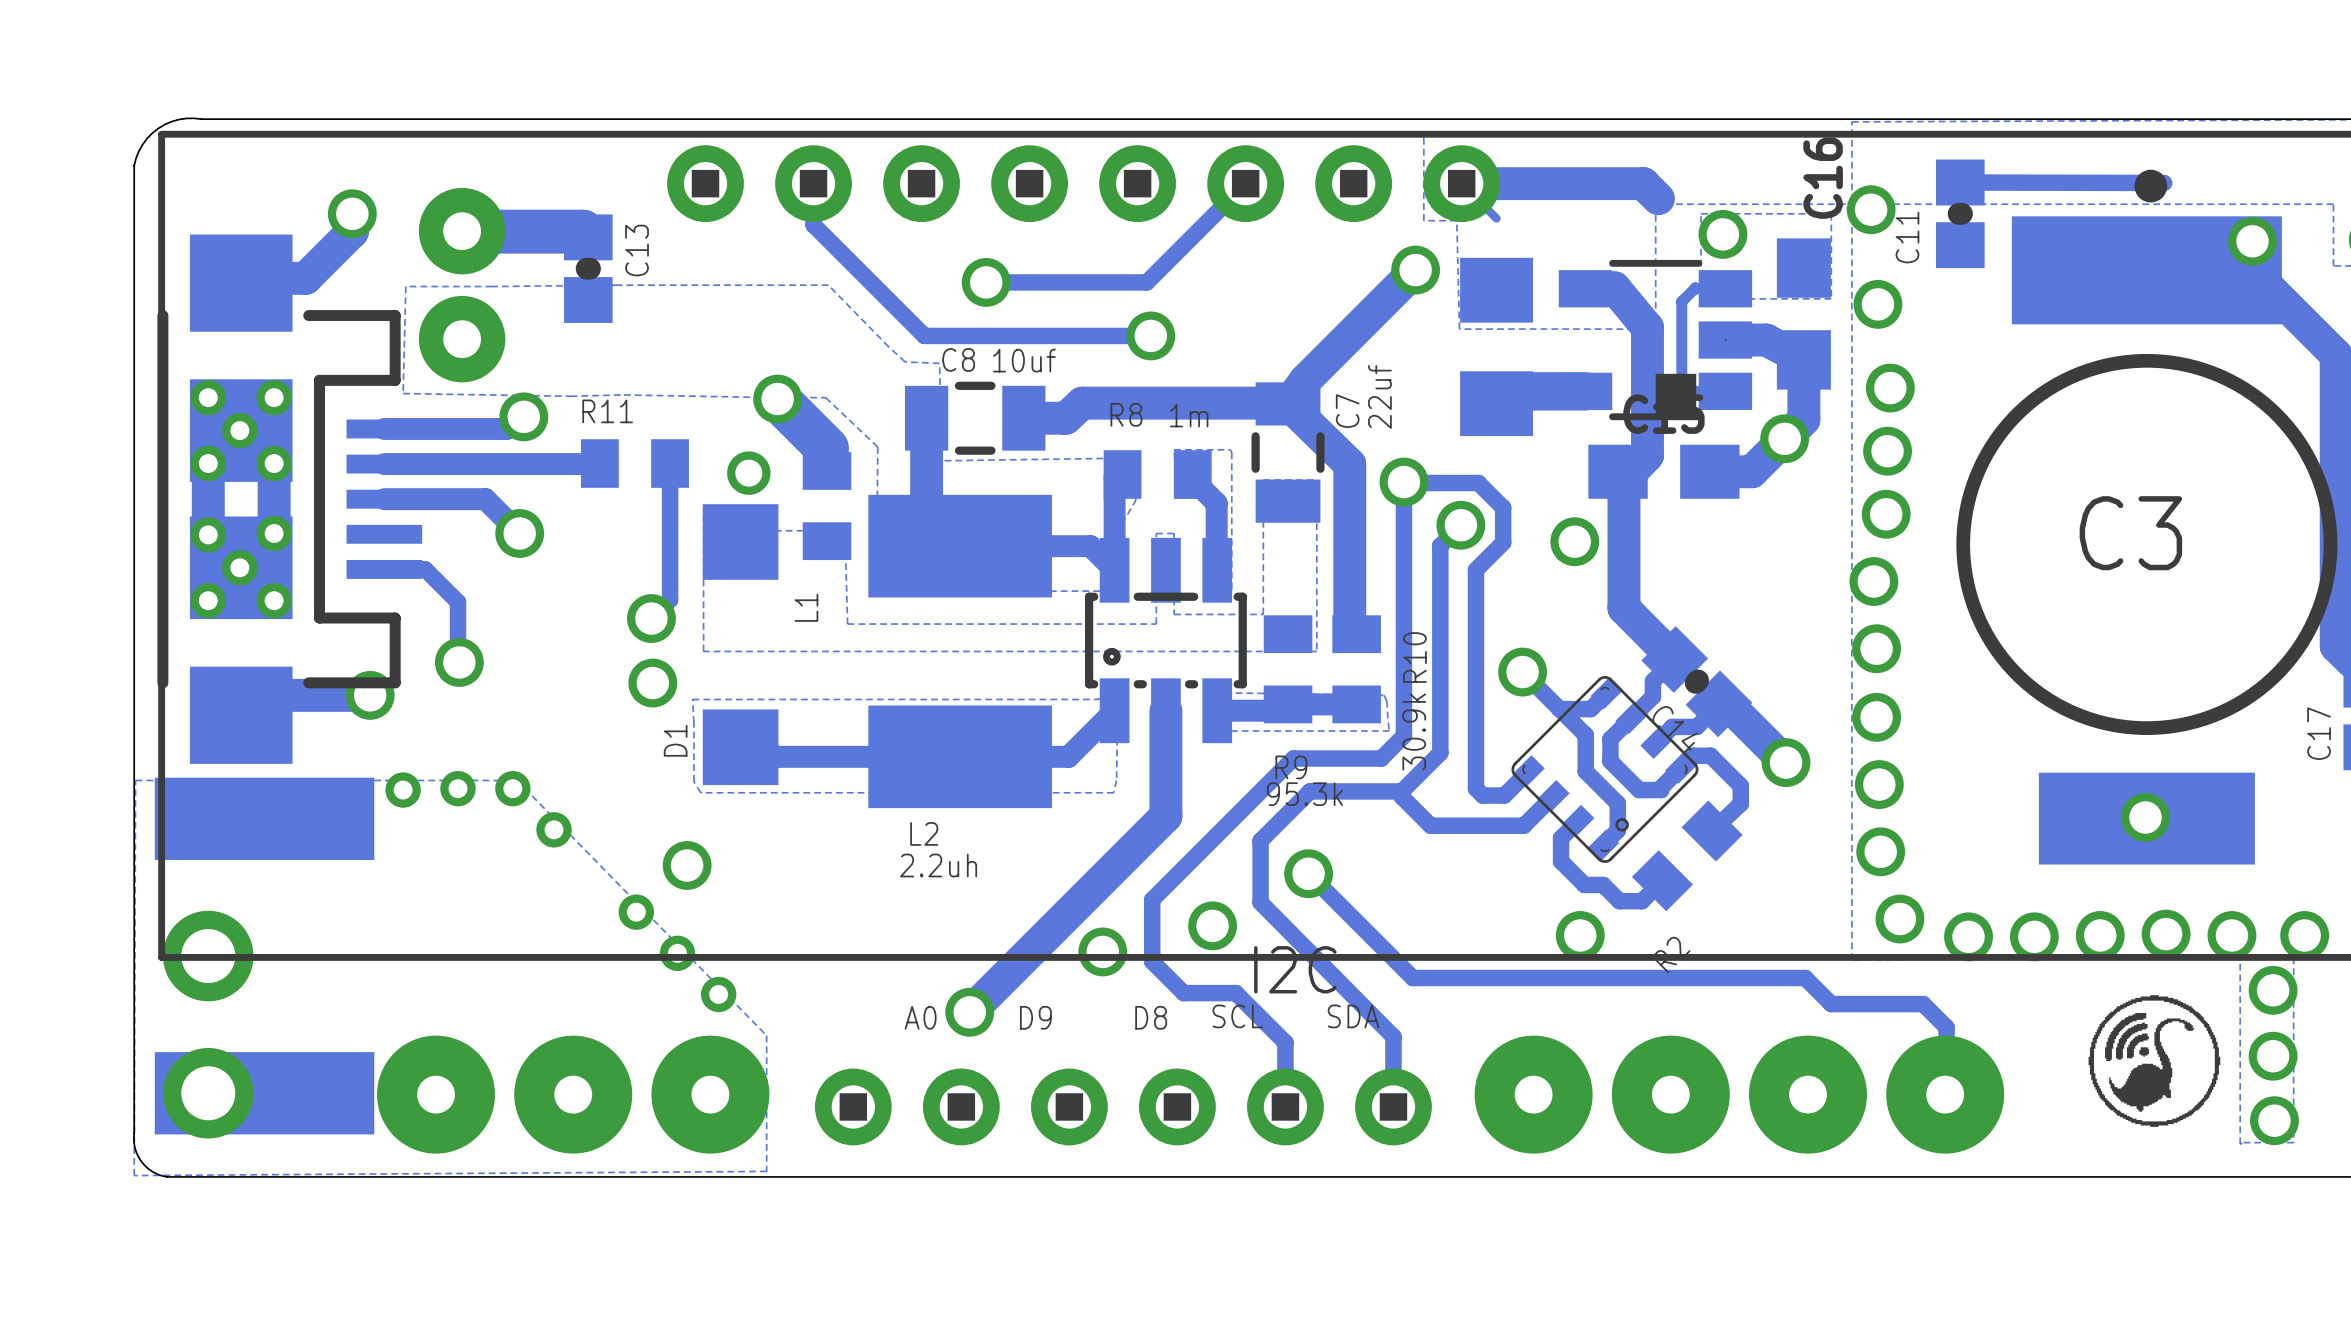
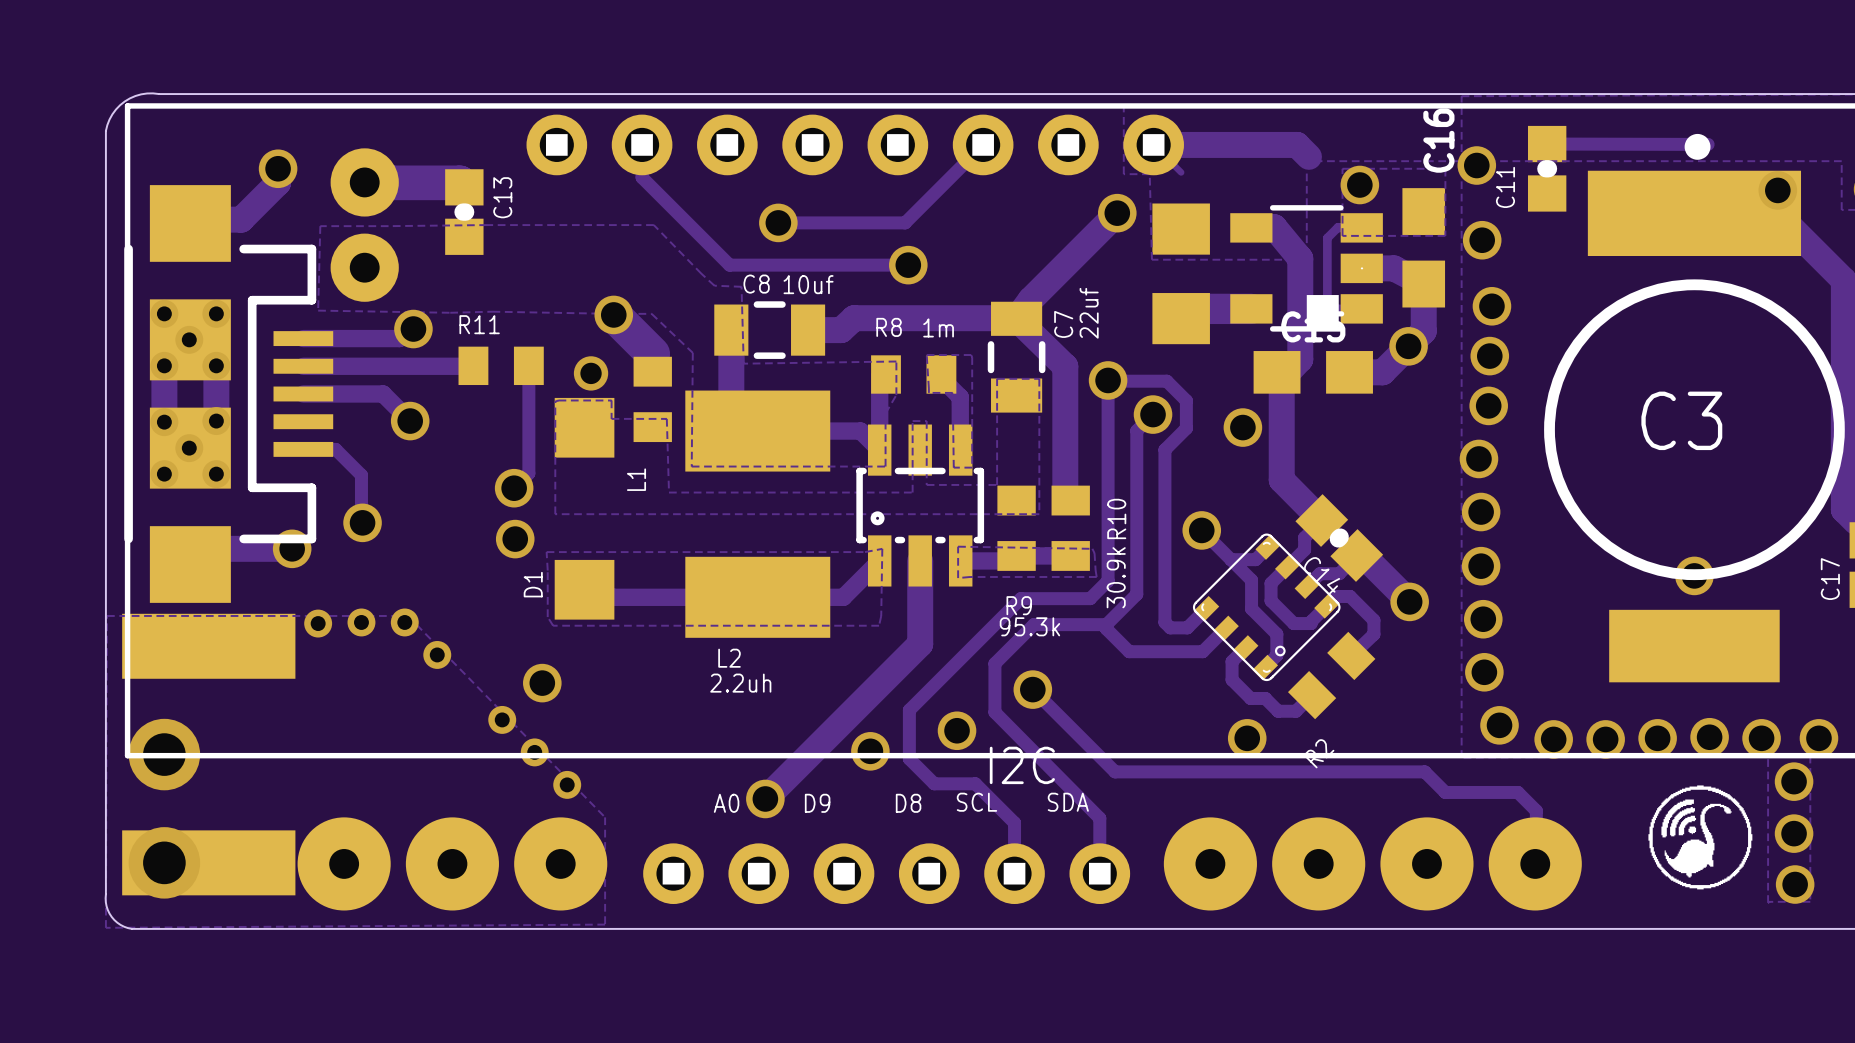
via position: (2145, 817) -> (1694, 575)

